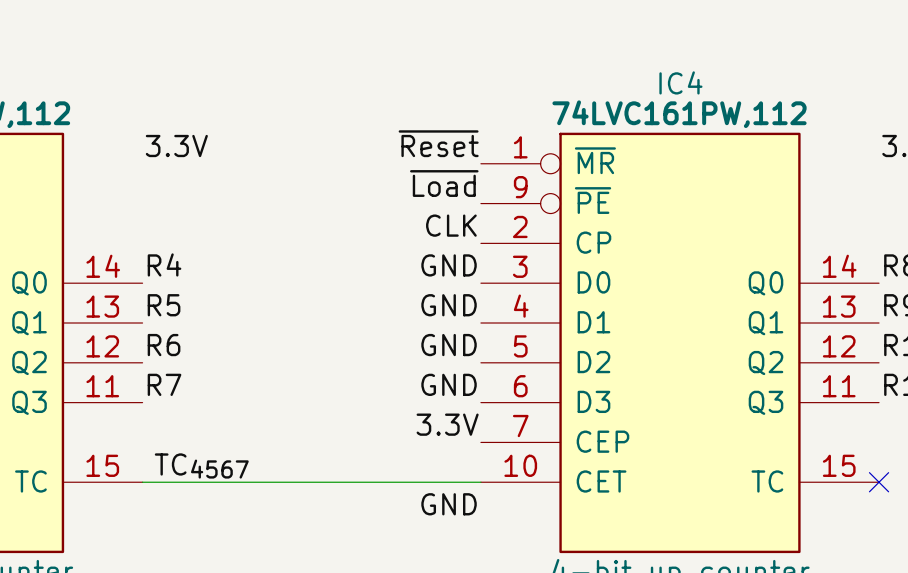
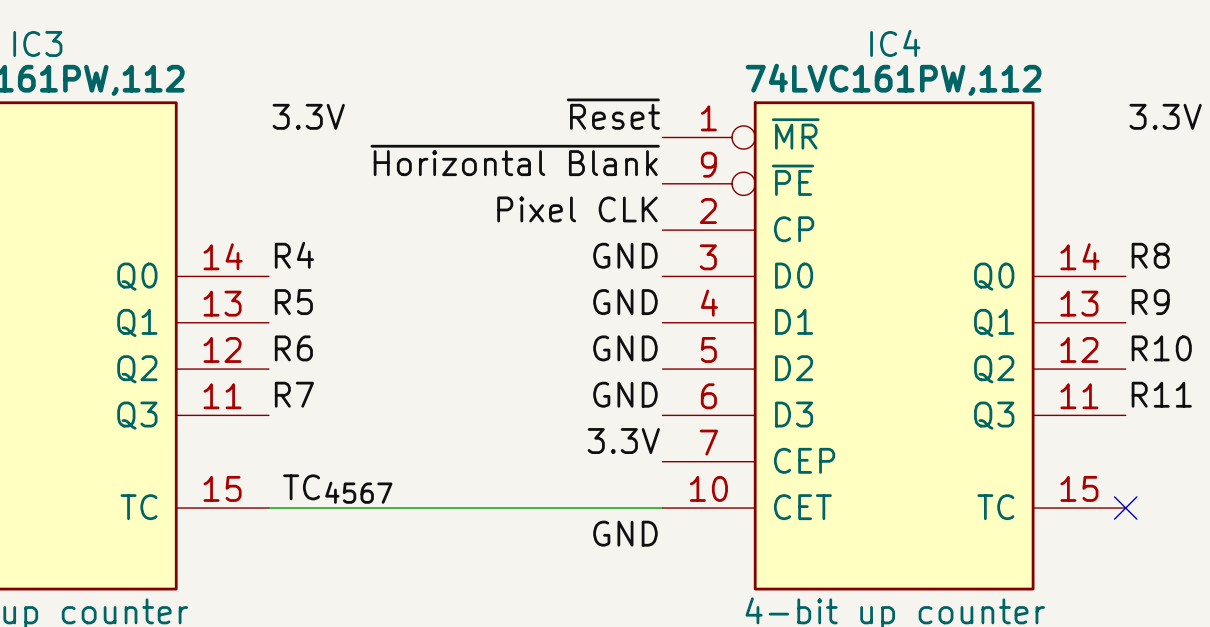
label: ~{Load} (444, 183) -> ~{Horizontal Blank} (515, 160)
label: CLK (451, 225) -> Pixel CLK (577, 209)

